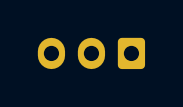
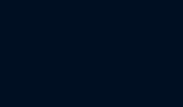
part: (91, 53) -> none

